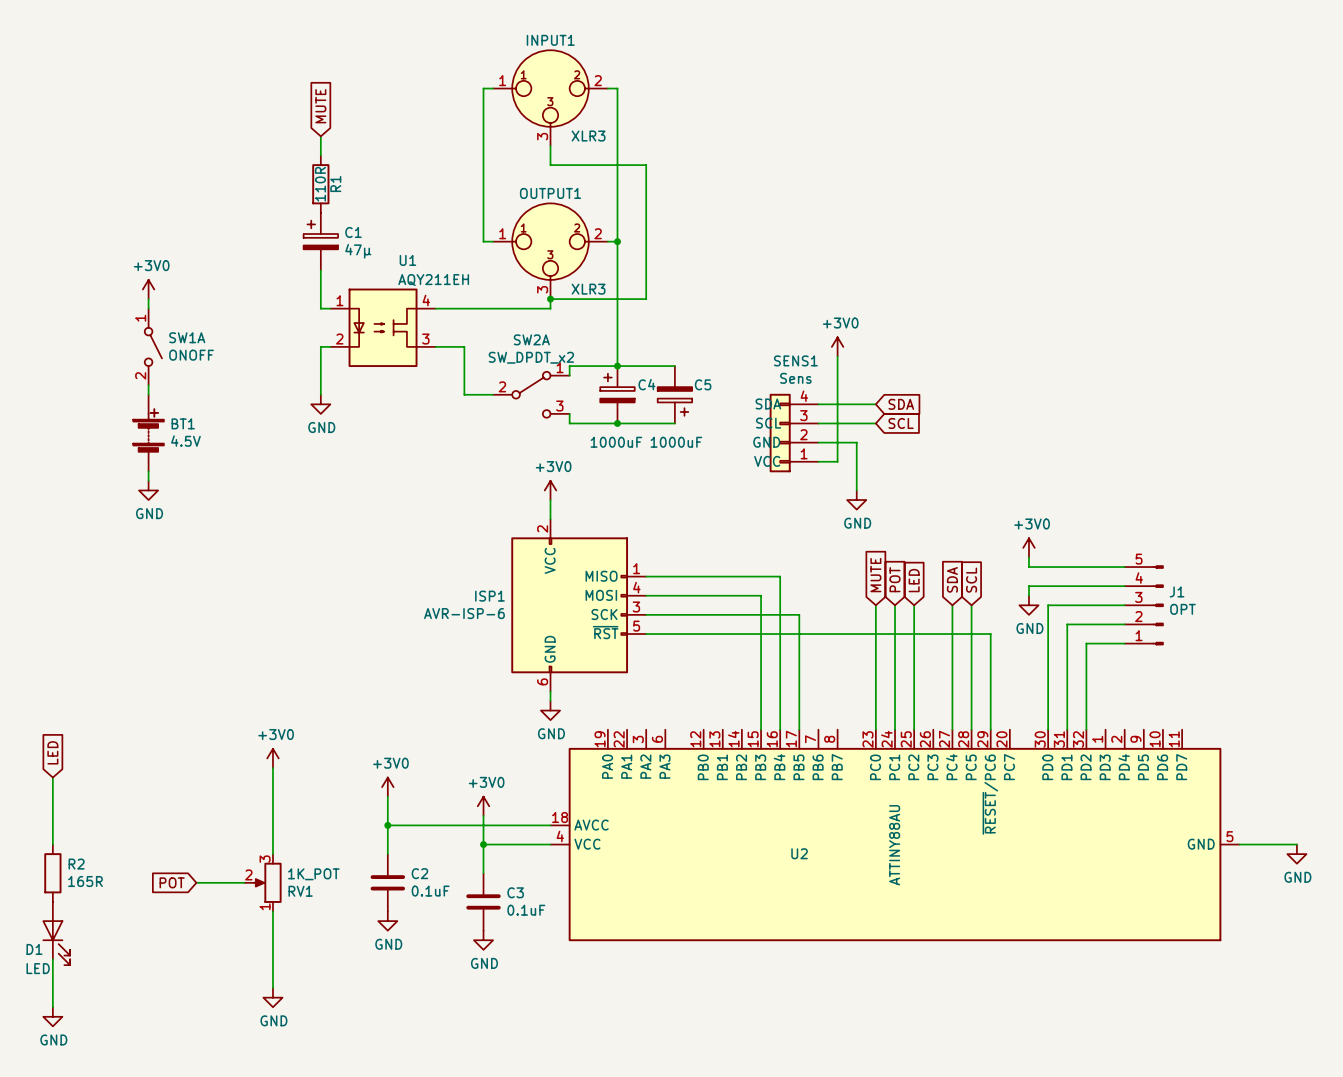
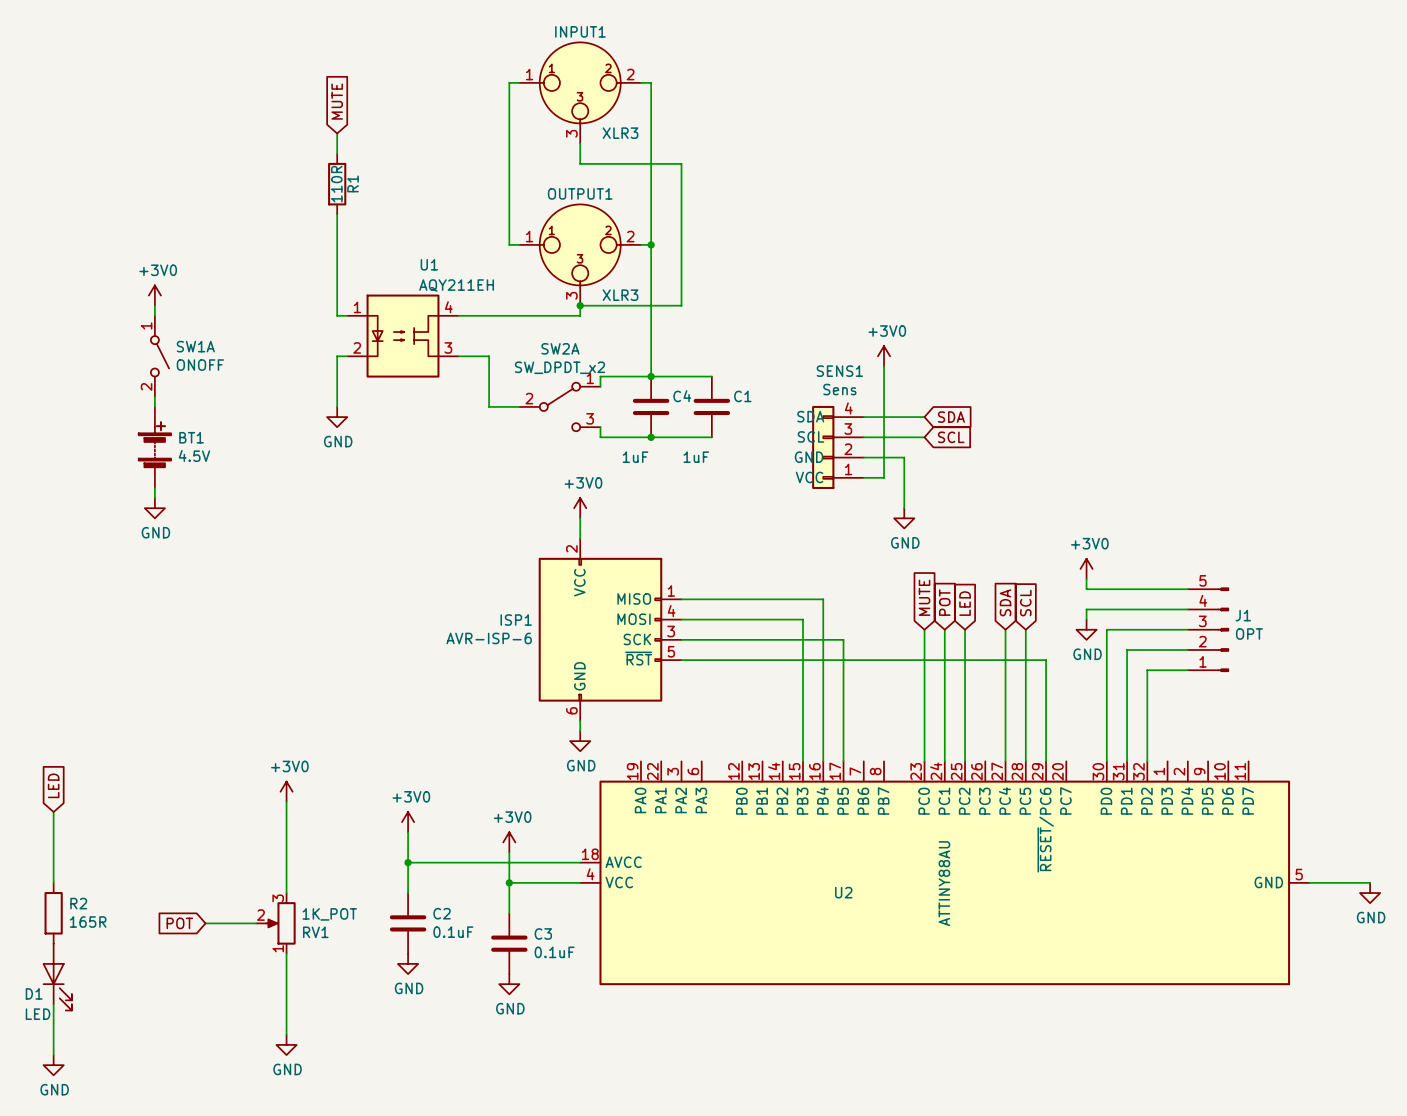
C1 symbol: [303, 212, 339, 271] -> [693, 376, 731, 438]
C1 value: 47µ (358, 251) -> 1uF (696, 457)
C4 symbol: [600, 366, 635, 424] -> [632, 376, 670, 438]
C5: 1000uF (674, 394) -> none
C4 value: 1000uF (616, 442) -> 1uF (635, 457)

